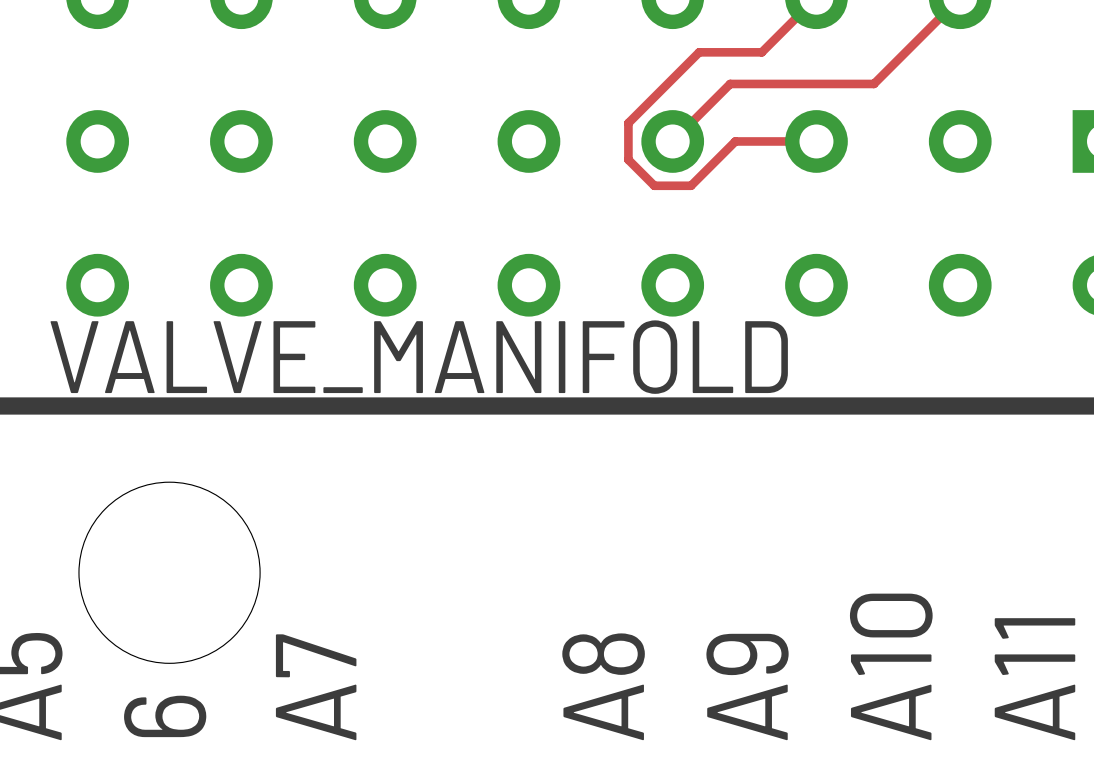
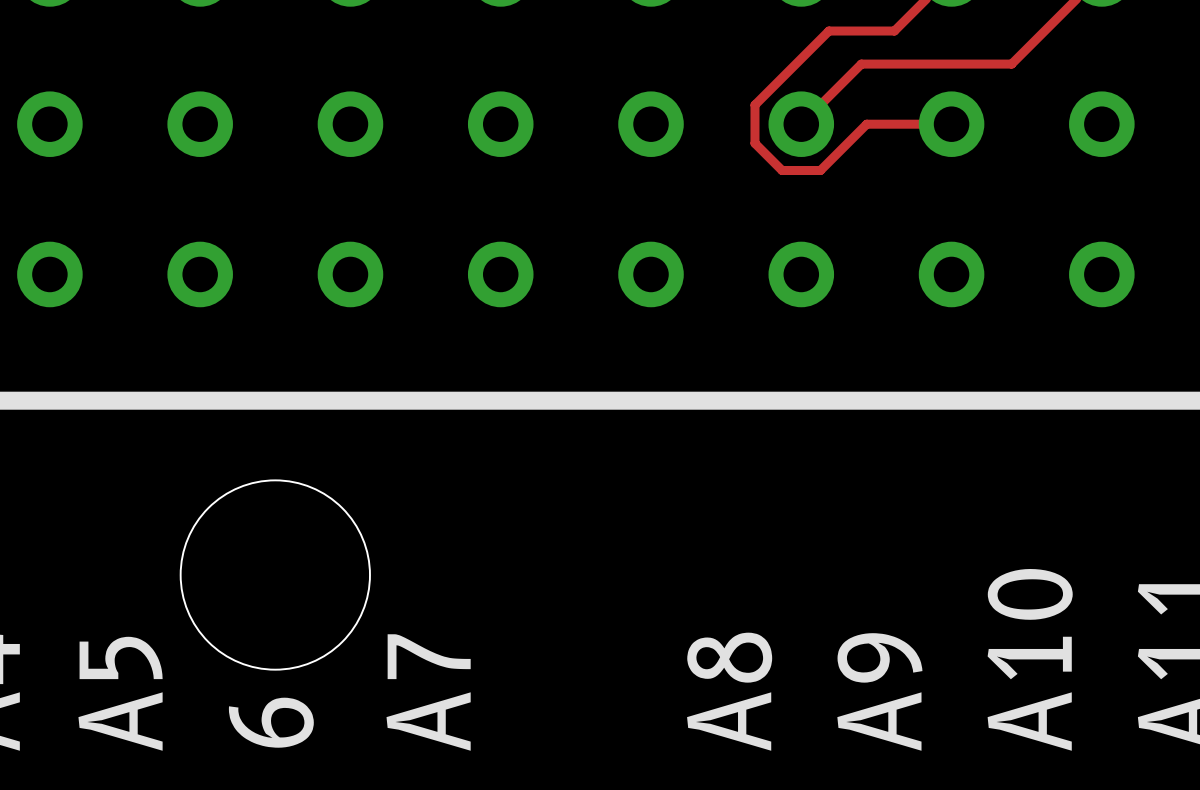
text: VALVE_MANIFOLD (419, 357) -> none

